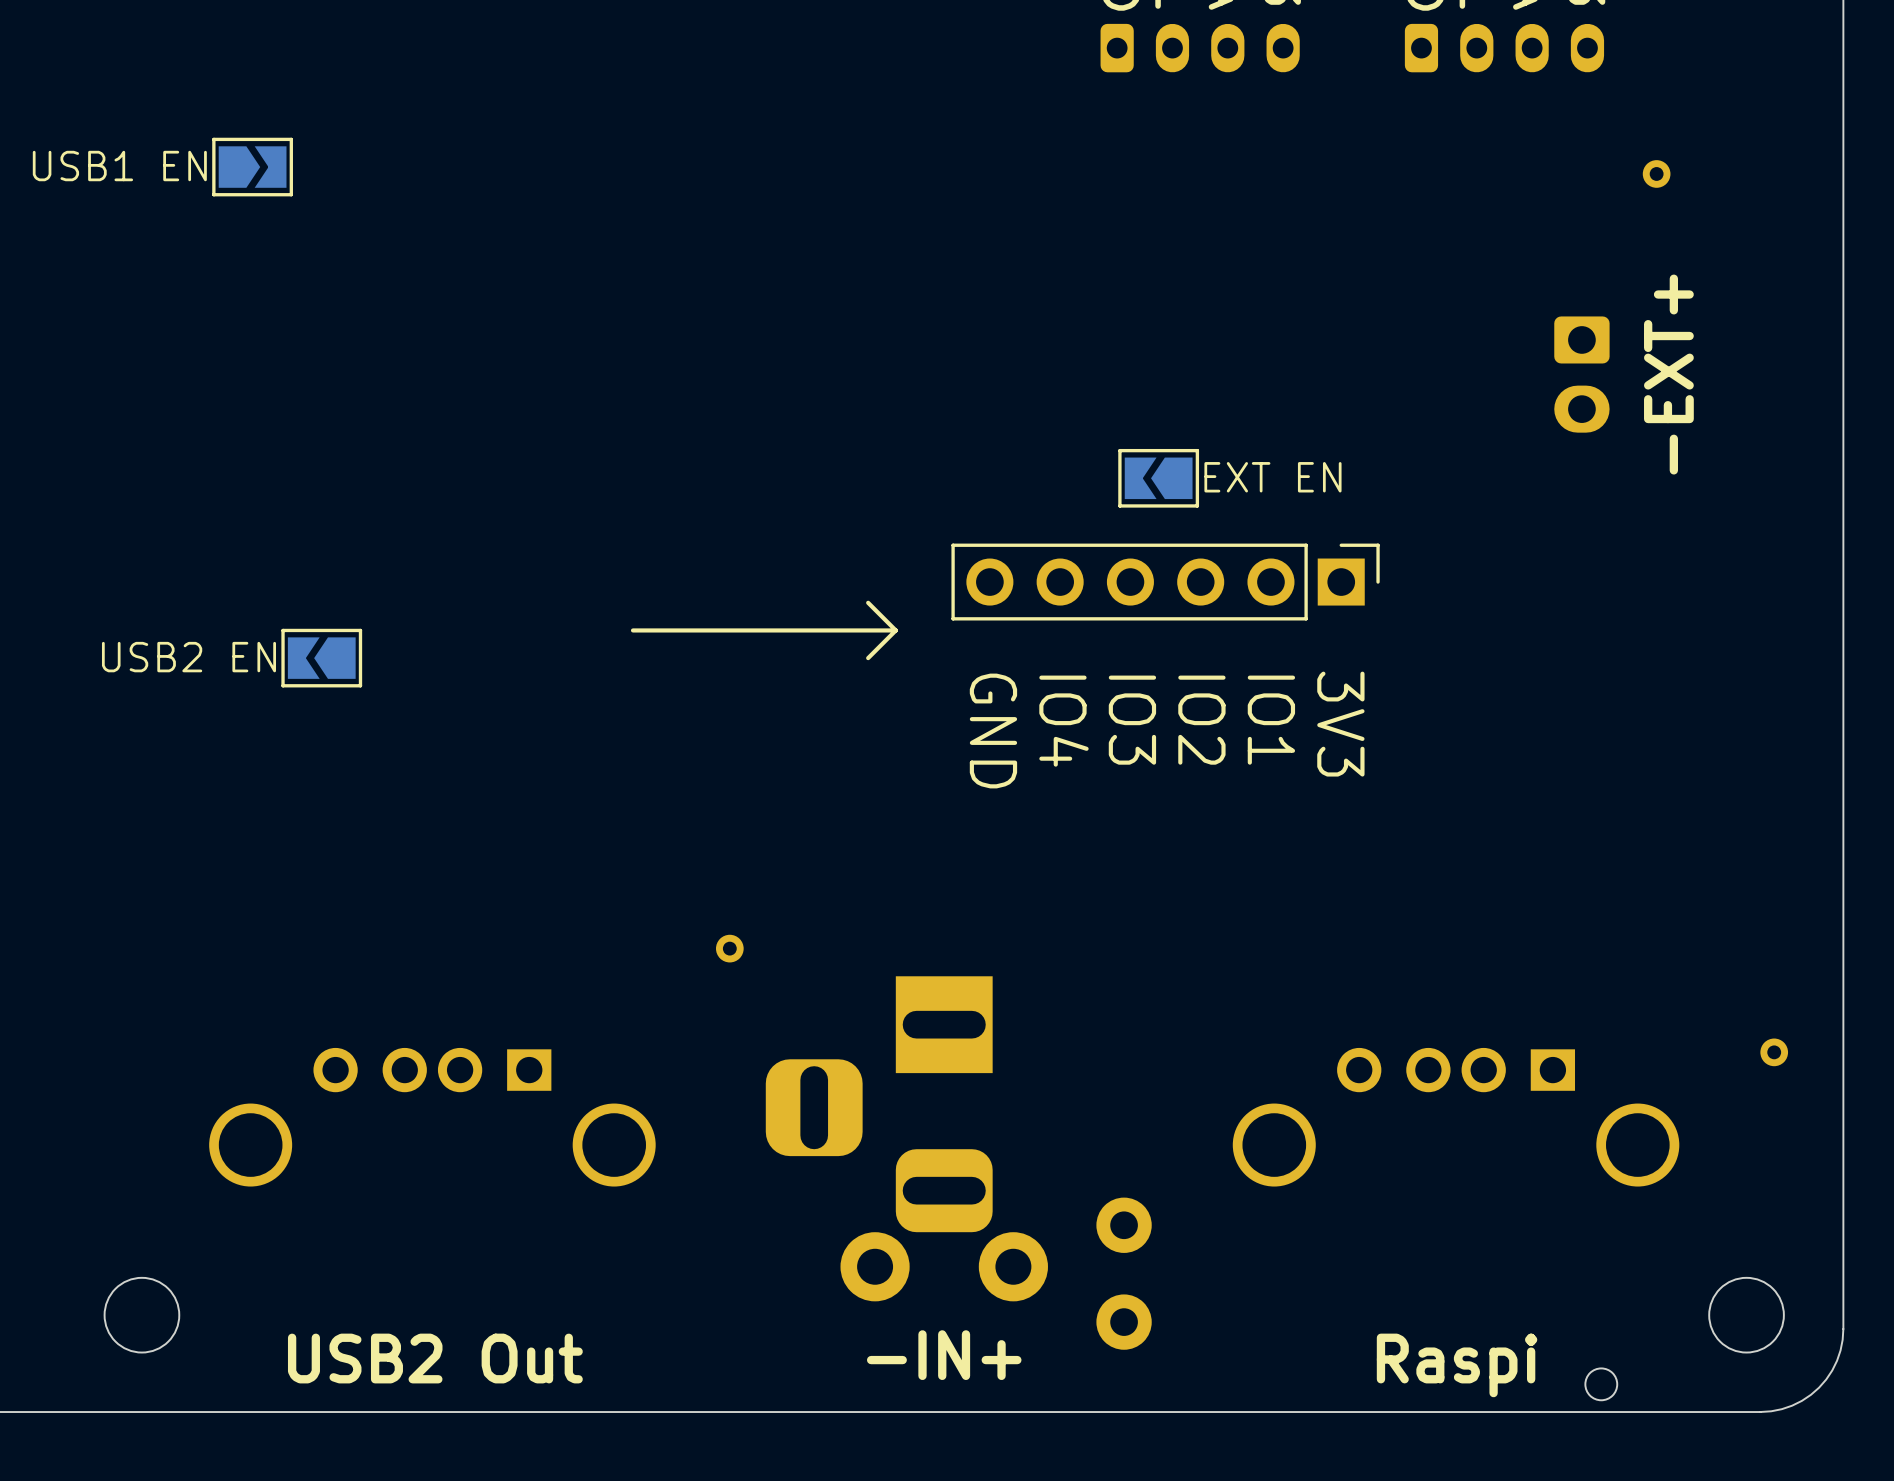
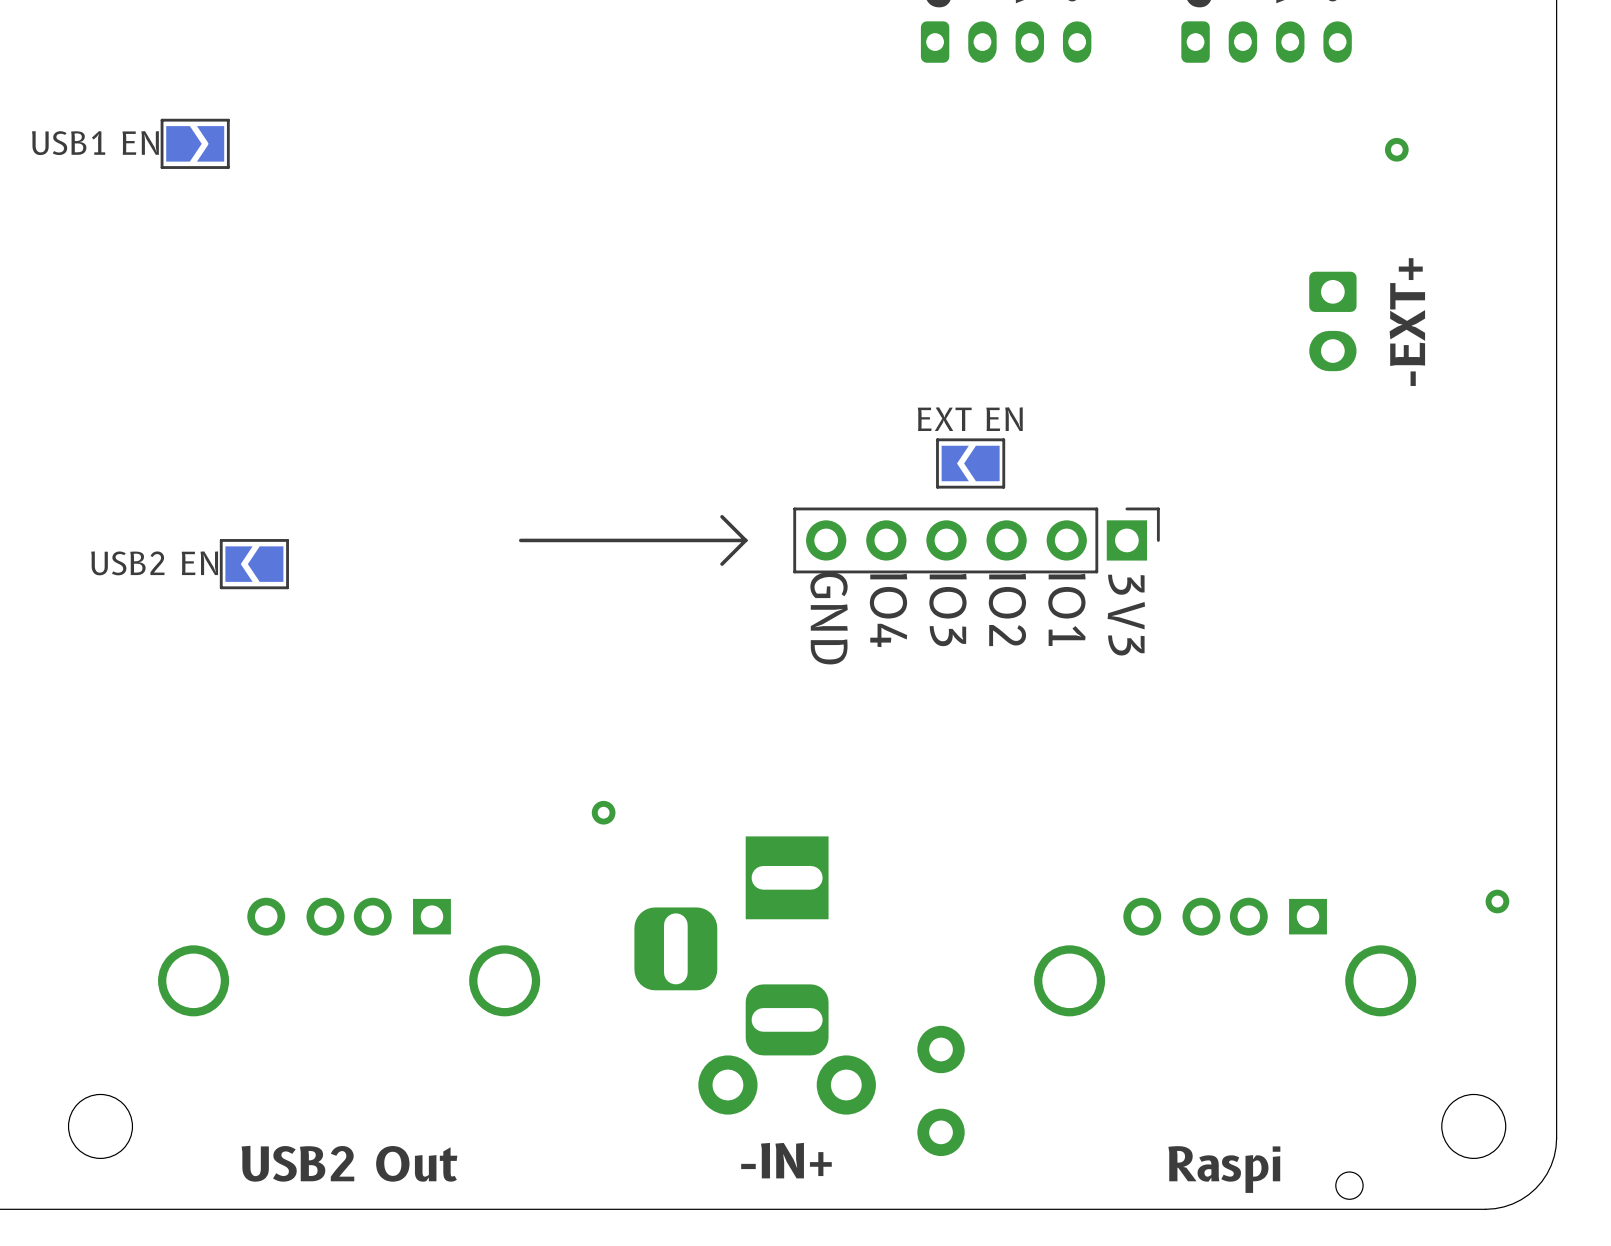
text position: EXT EN (1272, 477) -> EXT EN (970, 419)
part position: (1158, 478) -> (970, 463)
part position: (1165, 582) -> (976, 540)

